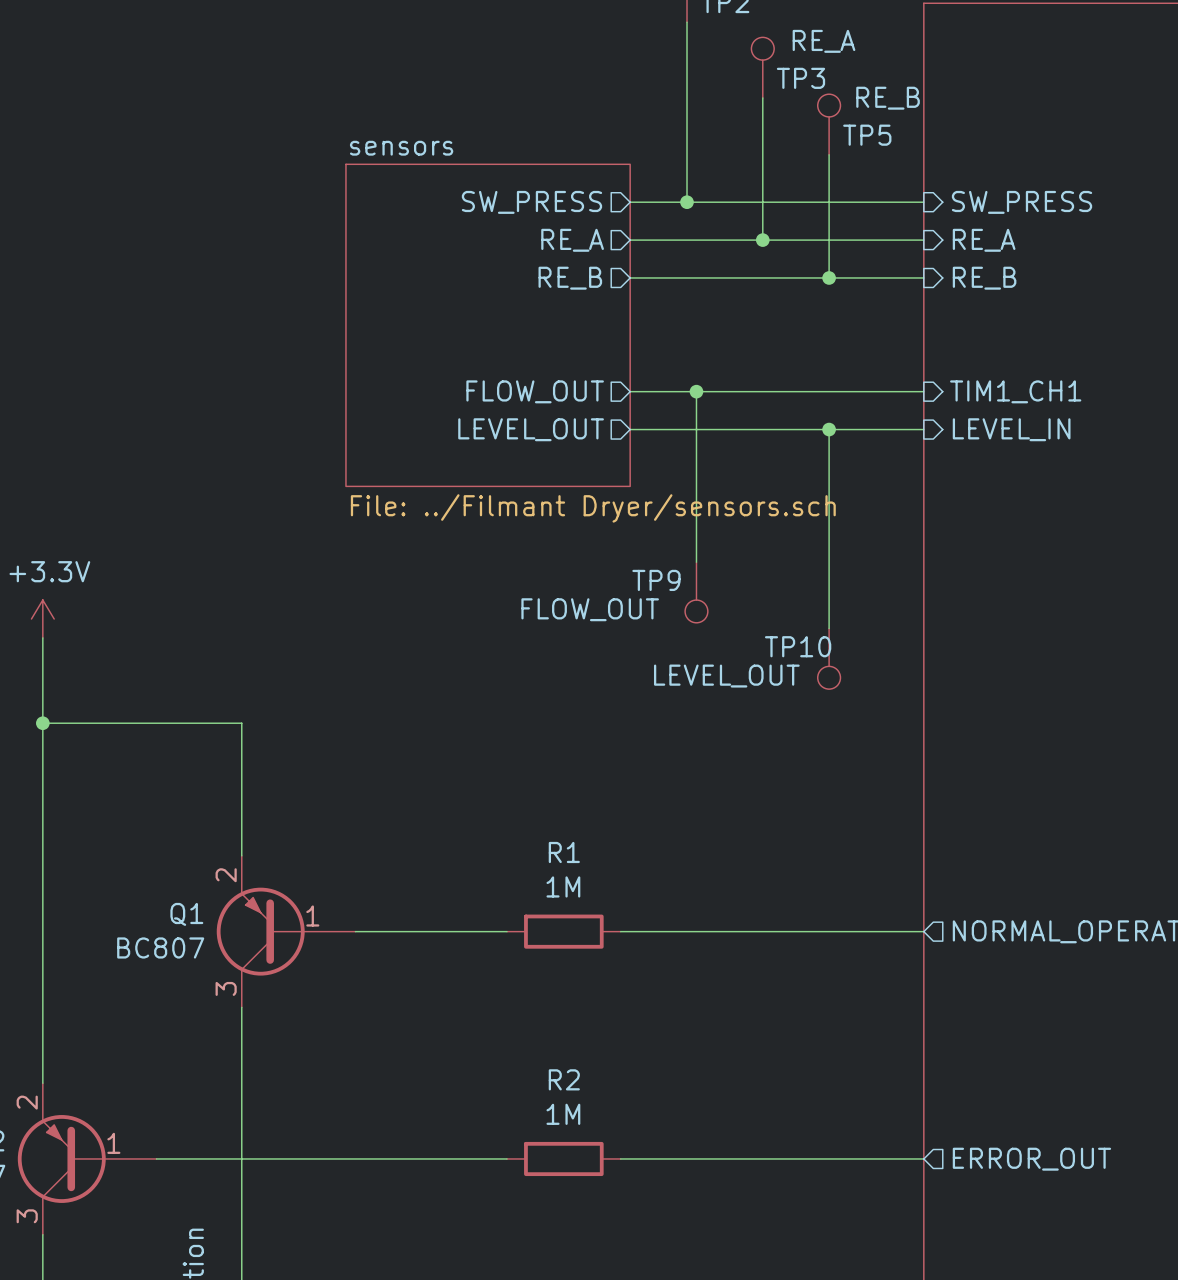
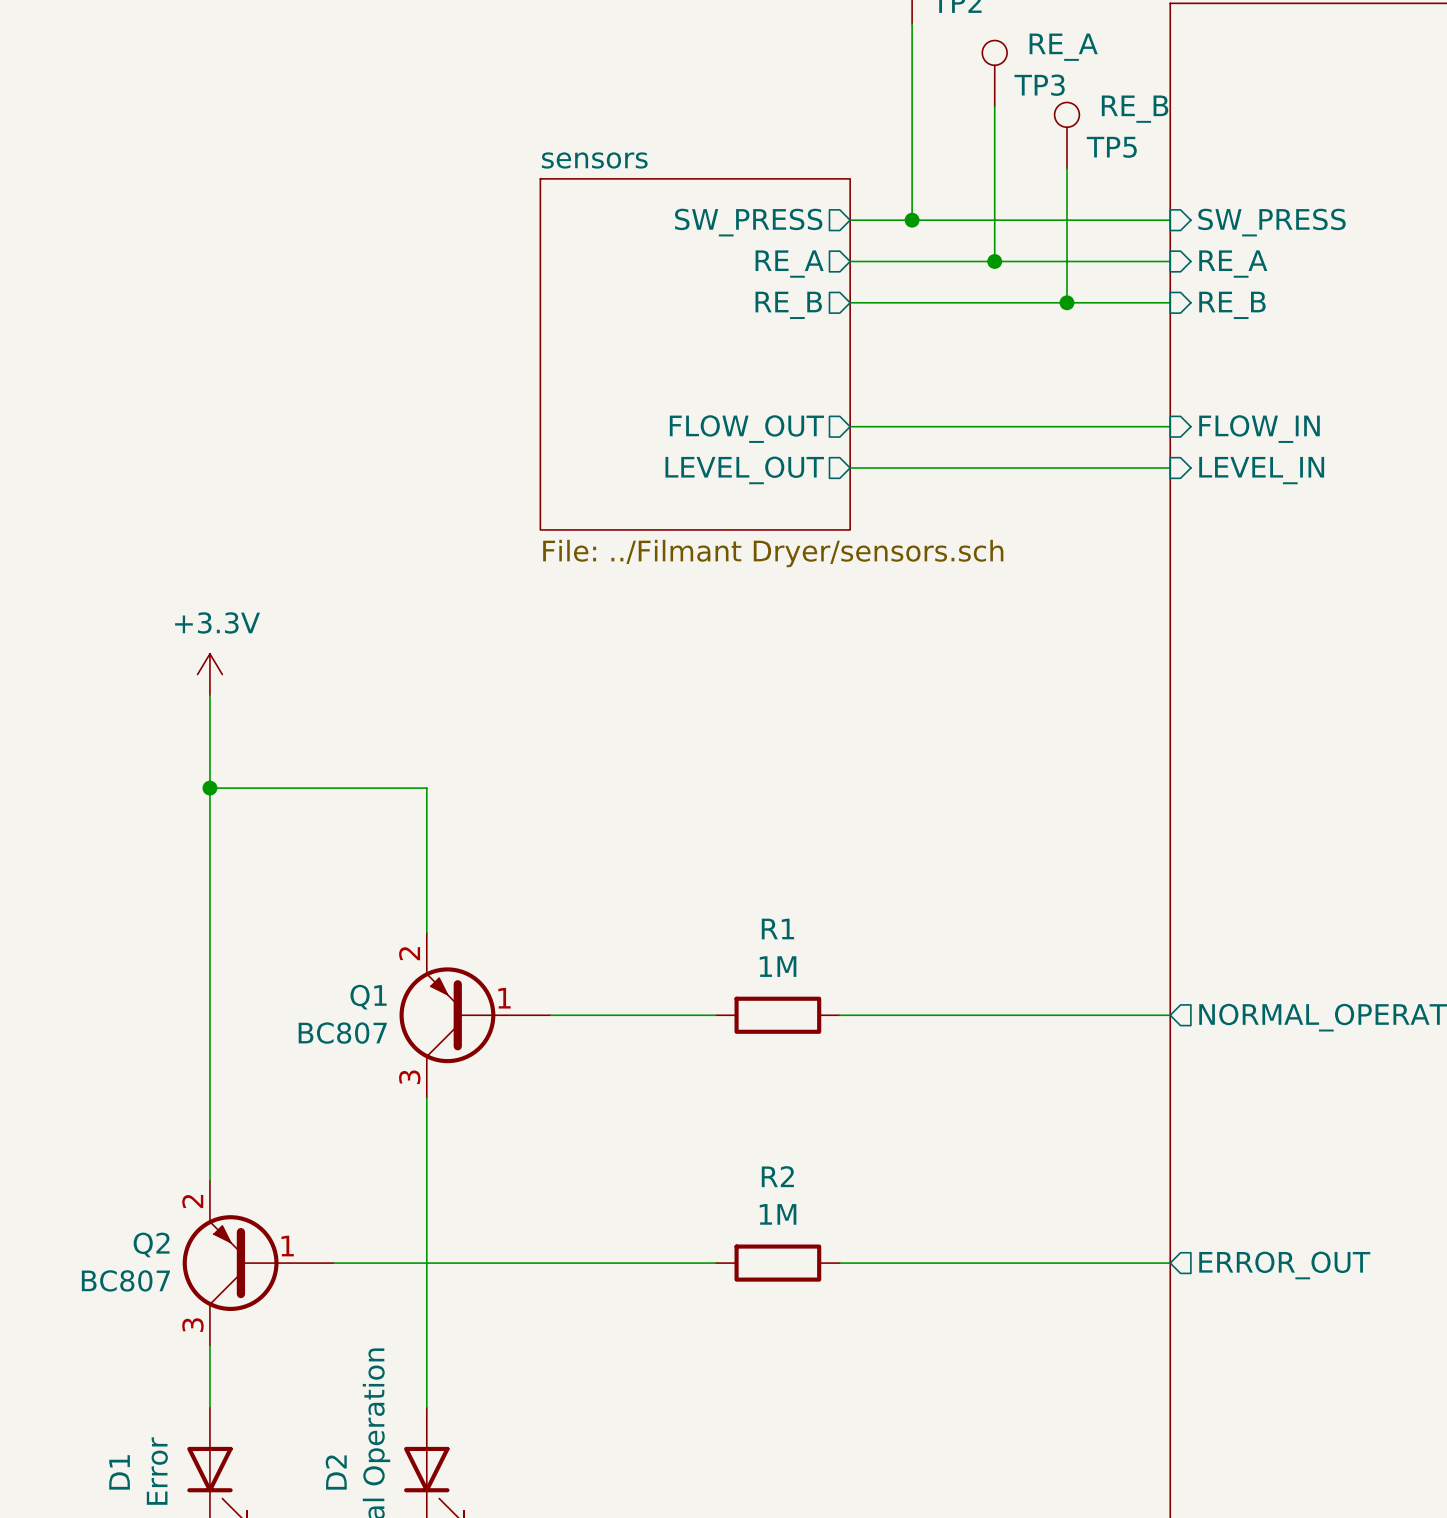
wire: (696, 391) (696, 562) -> none
junction: (696, 391) -> none
sheet pin: TIM1_CH1 (1015, 391) -> FLOW_IN (1259, 429)
wire: (829, 429) (829, 628) -> none
junction: (829, 429) -> none
TP9: FLOW_OUT (696, 592) -> none
TP10: LEVEL_OUT (829, 658) -> none

